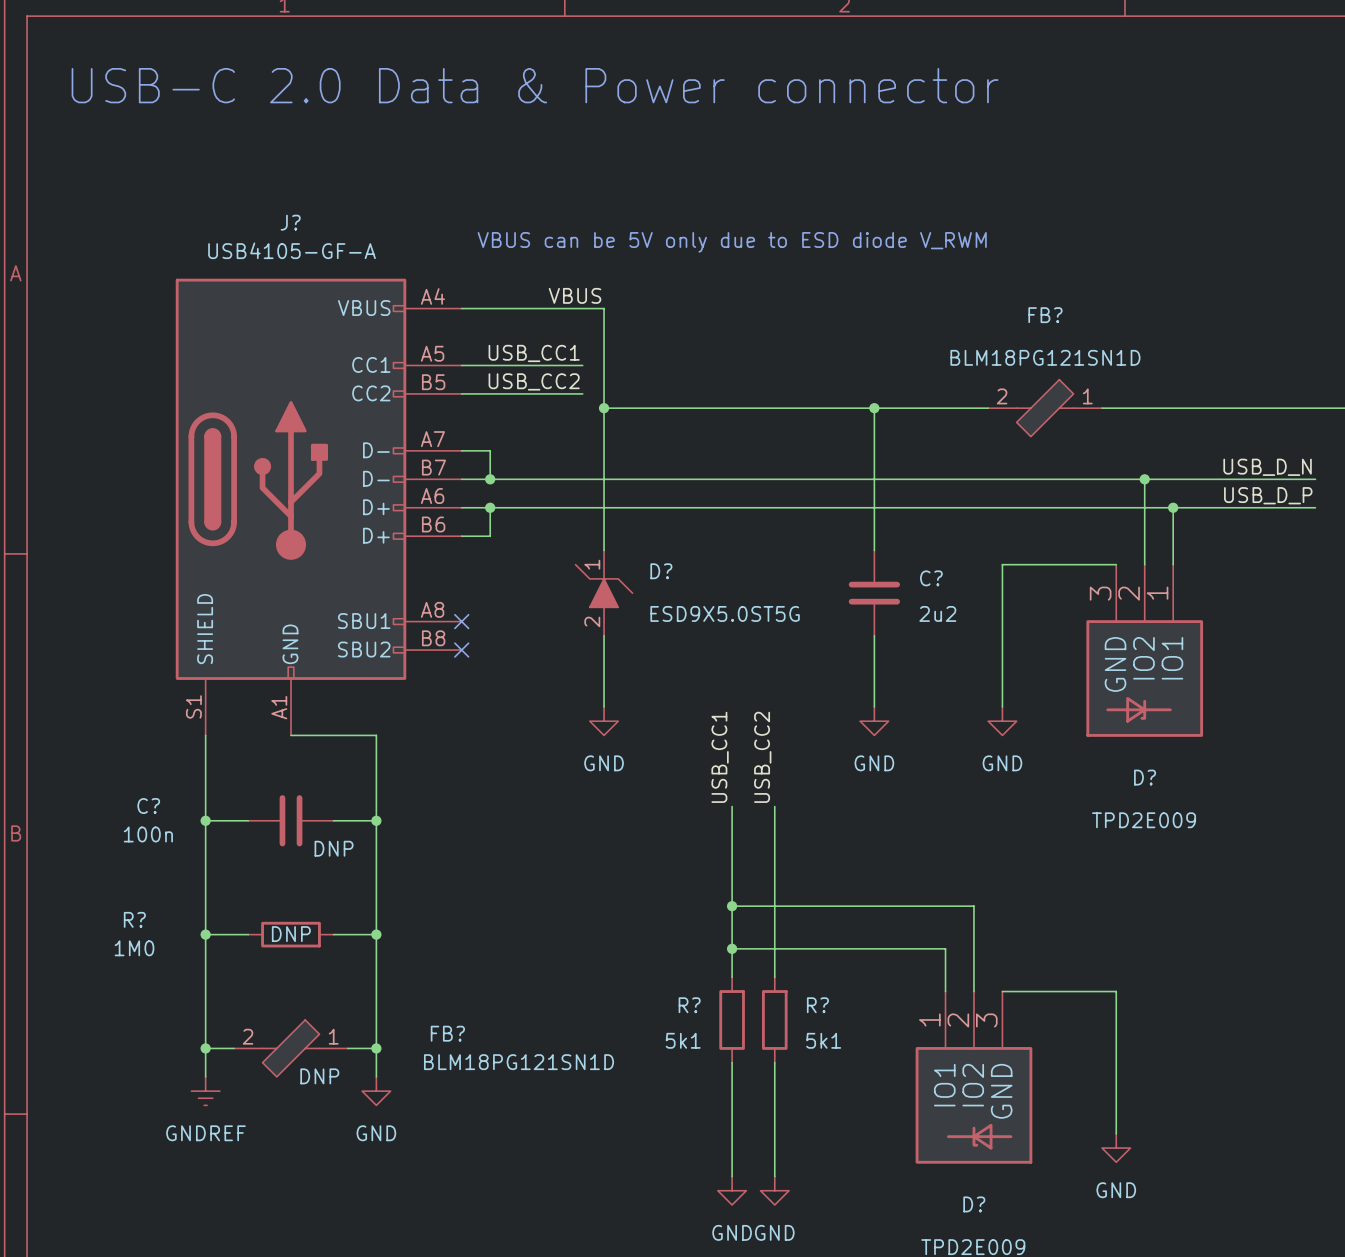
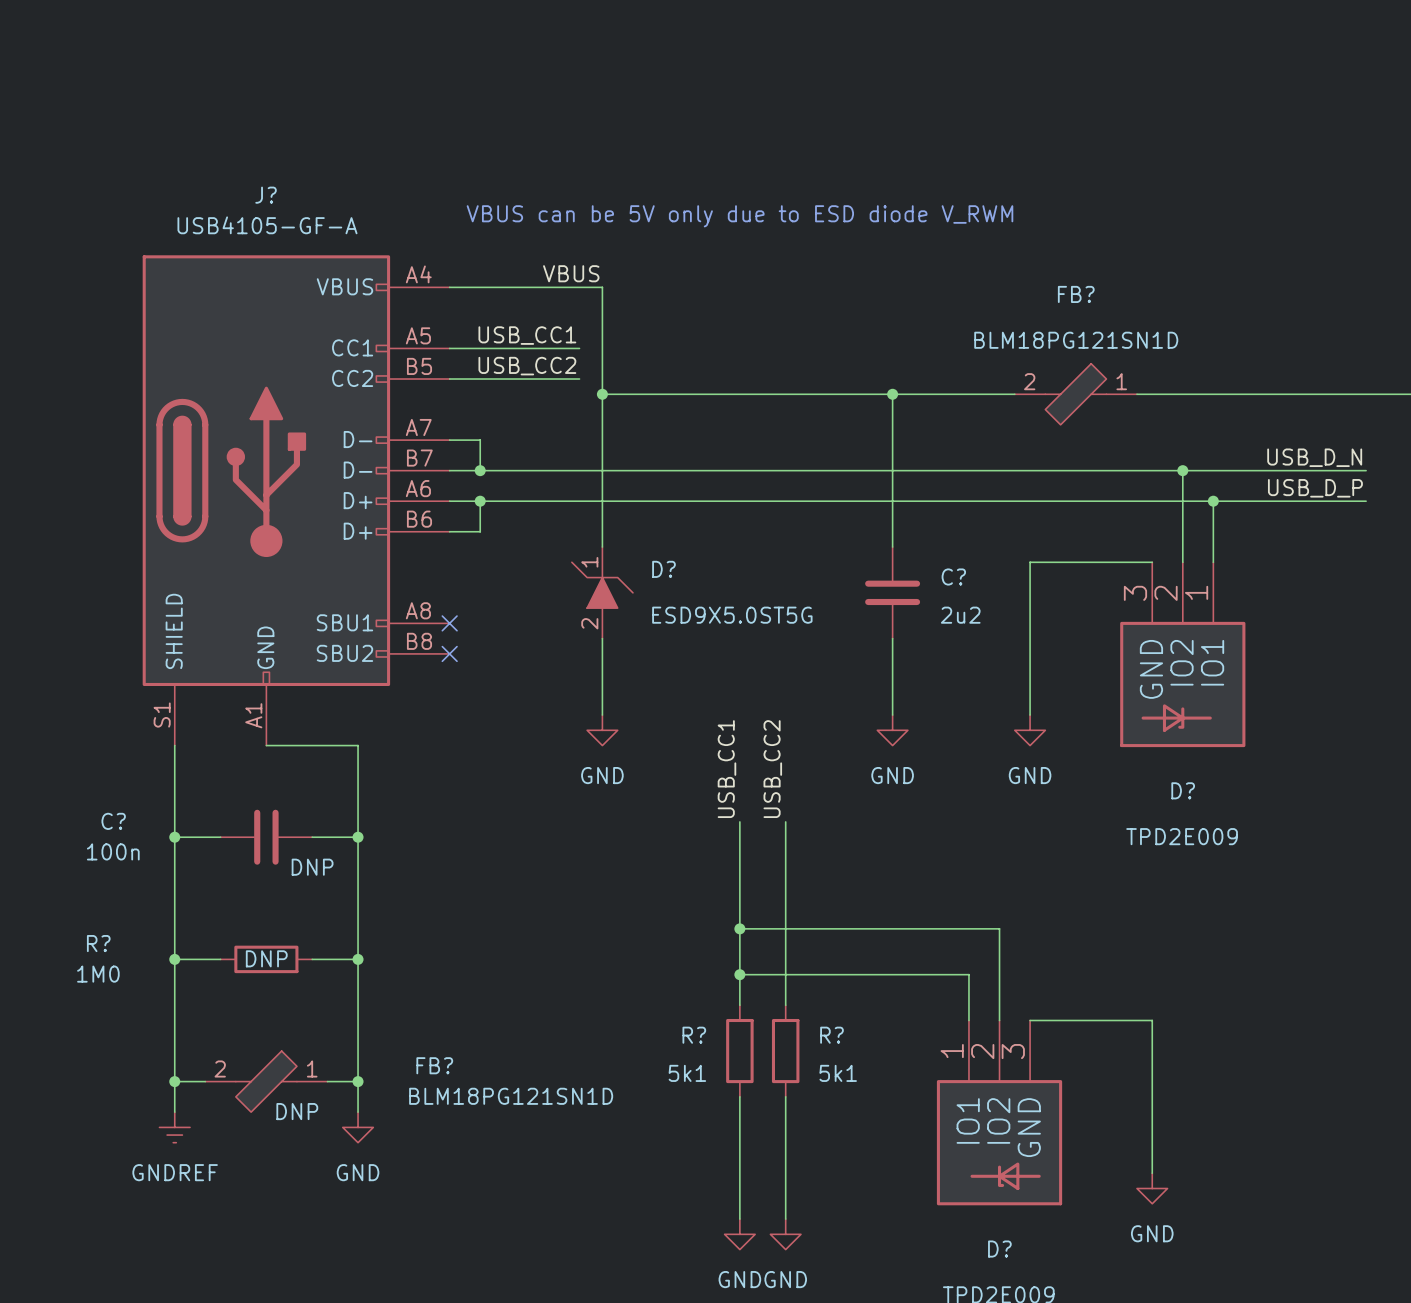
text: USB-C 2.0 Data & Power connector (535, 85) -> none

